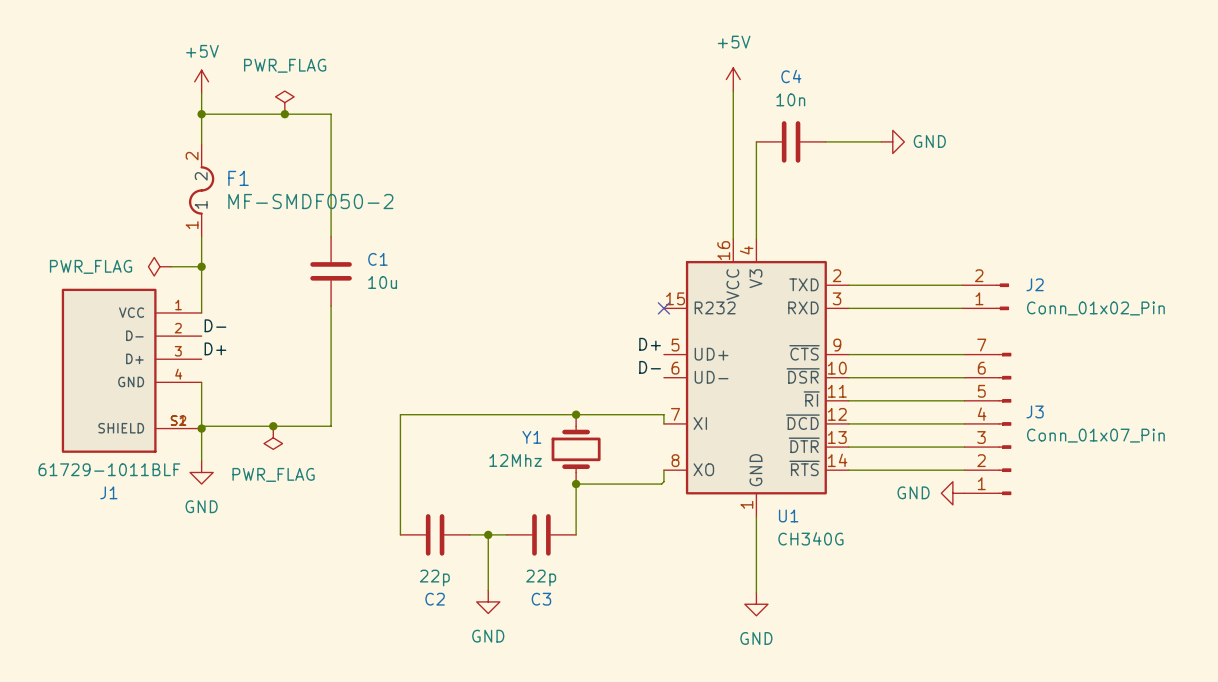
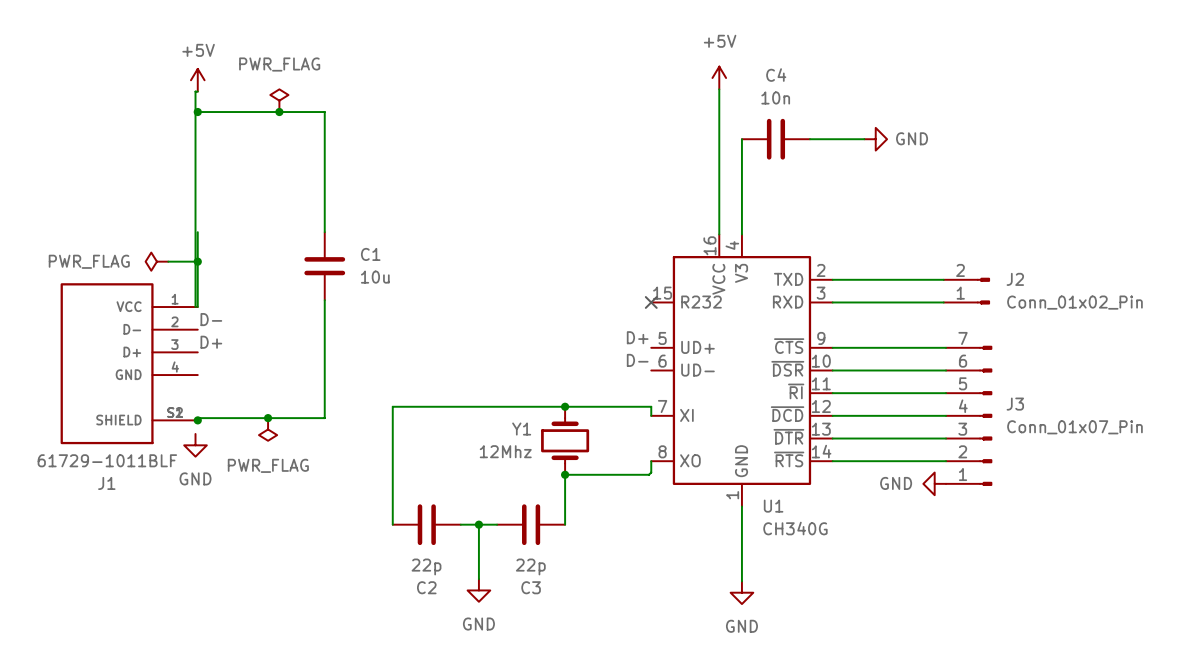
wire: (201, 93) (201, 144) -> (197, 91) (195, 91) (195, 307)
F1: MF-SMDF050-2 (201, 190) -> none
wire: (201, 382) (201, 460) -> none
power symbol position: GND (201, 472) -> GND (195, 445)

